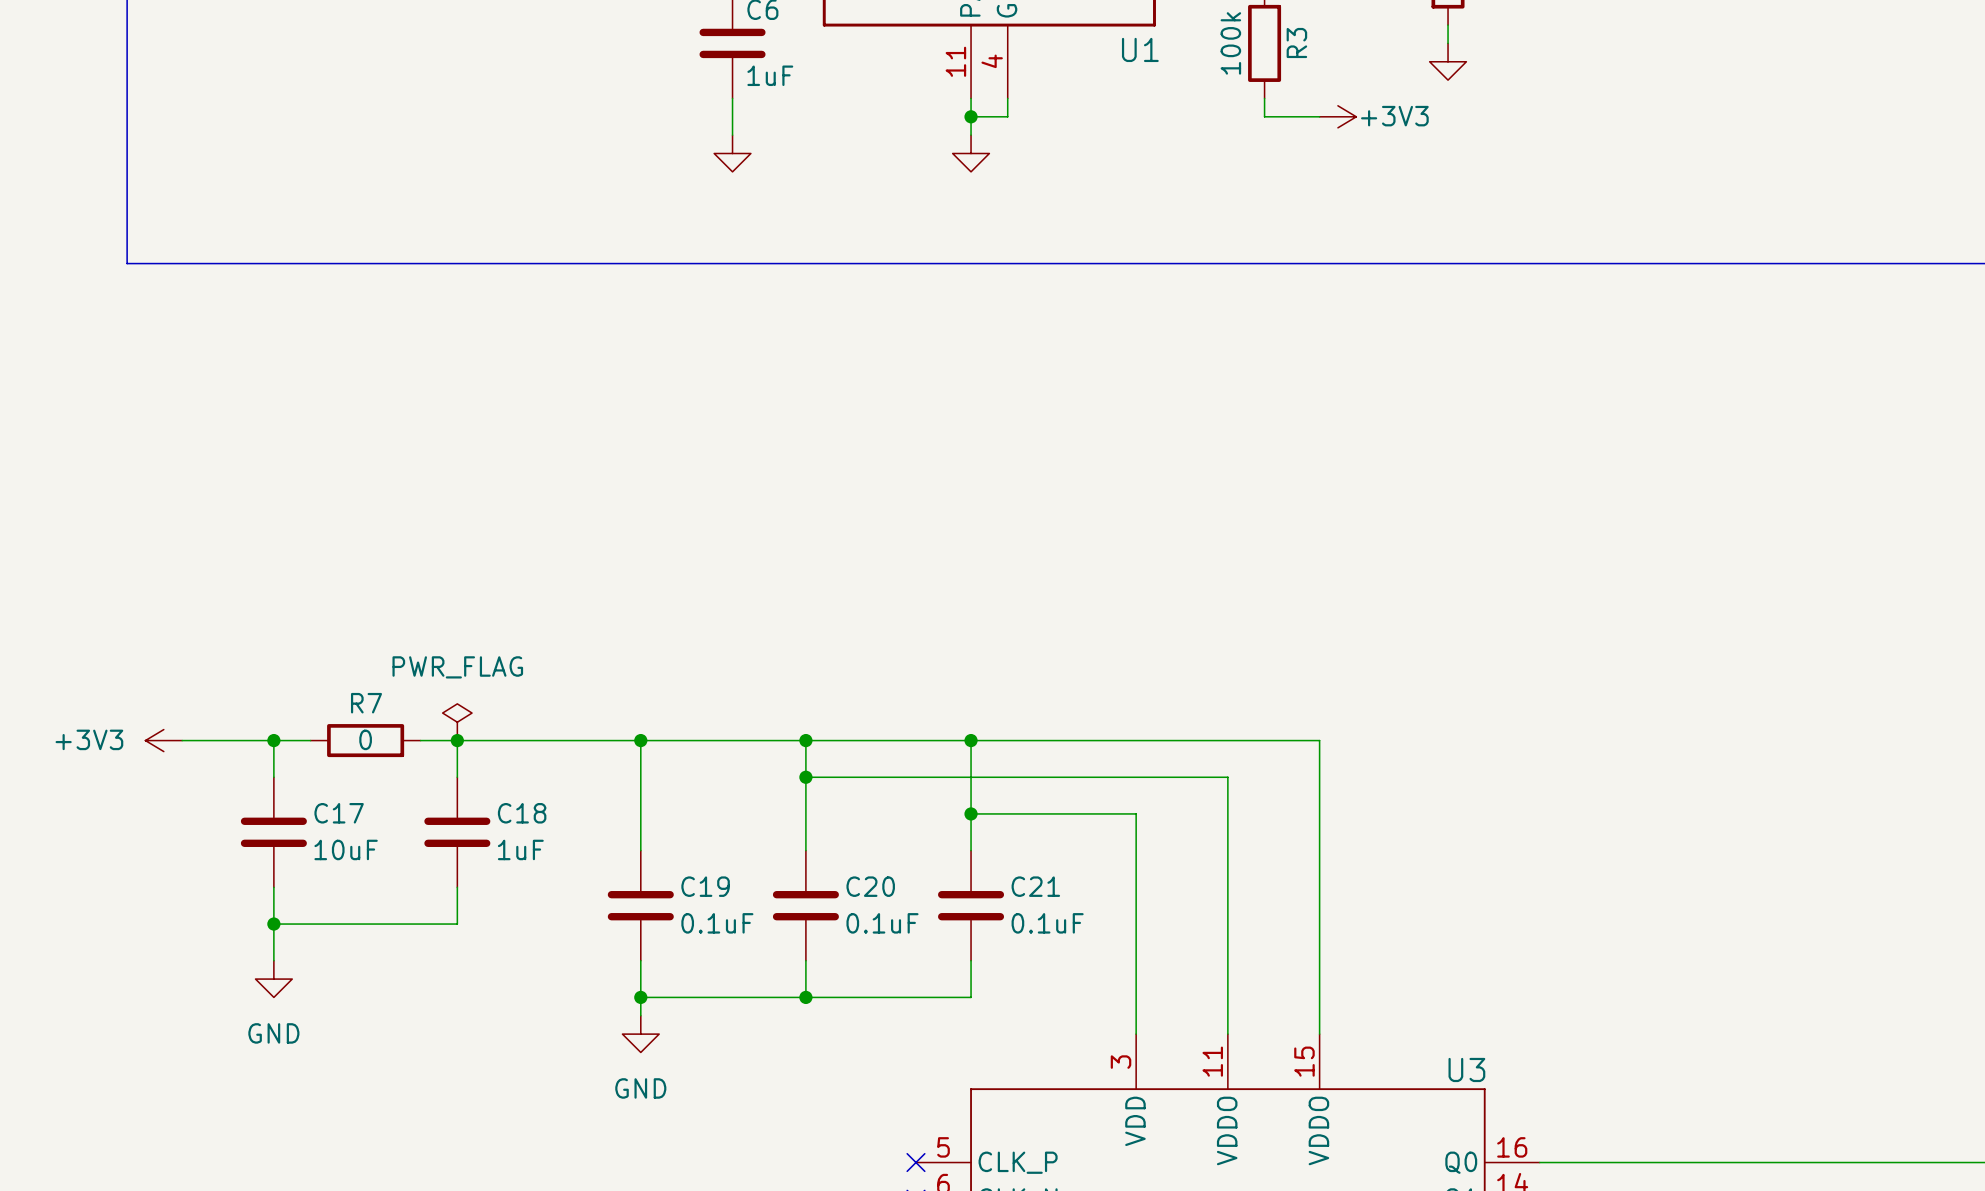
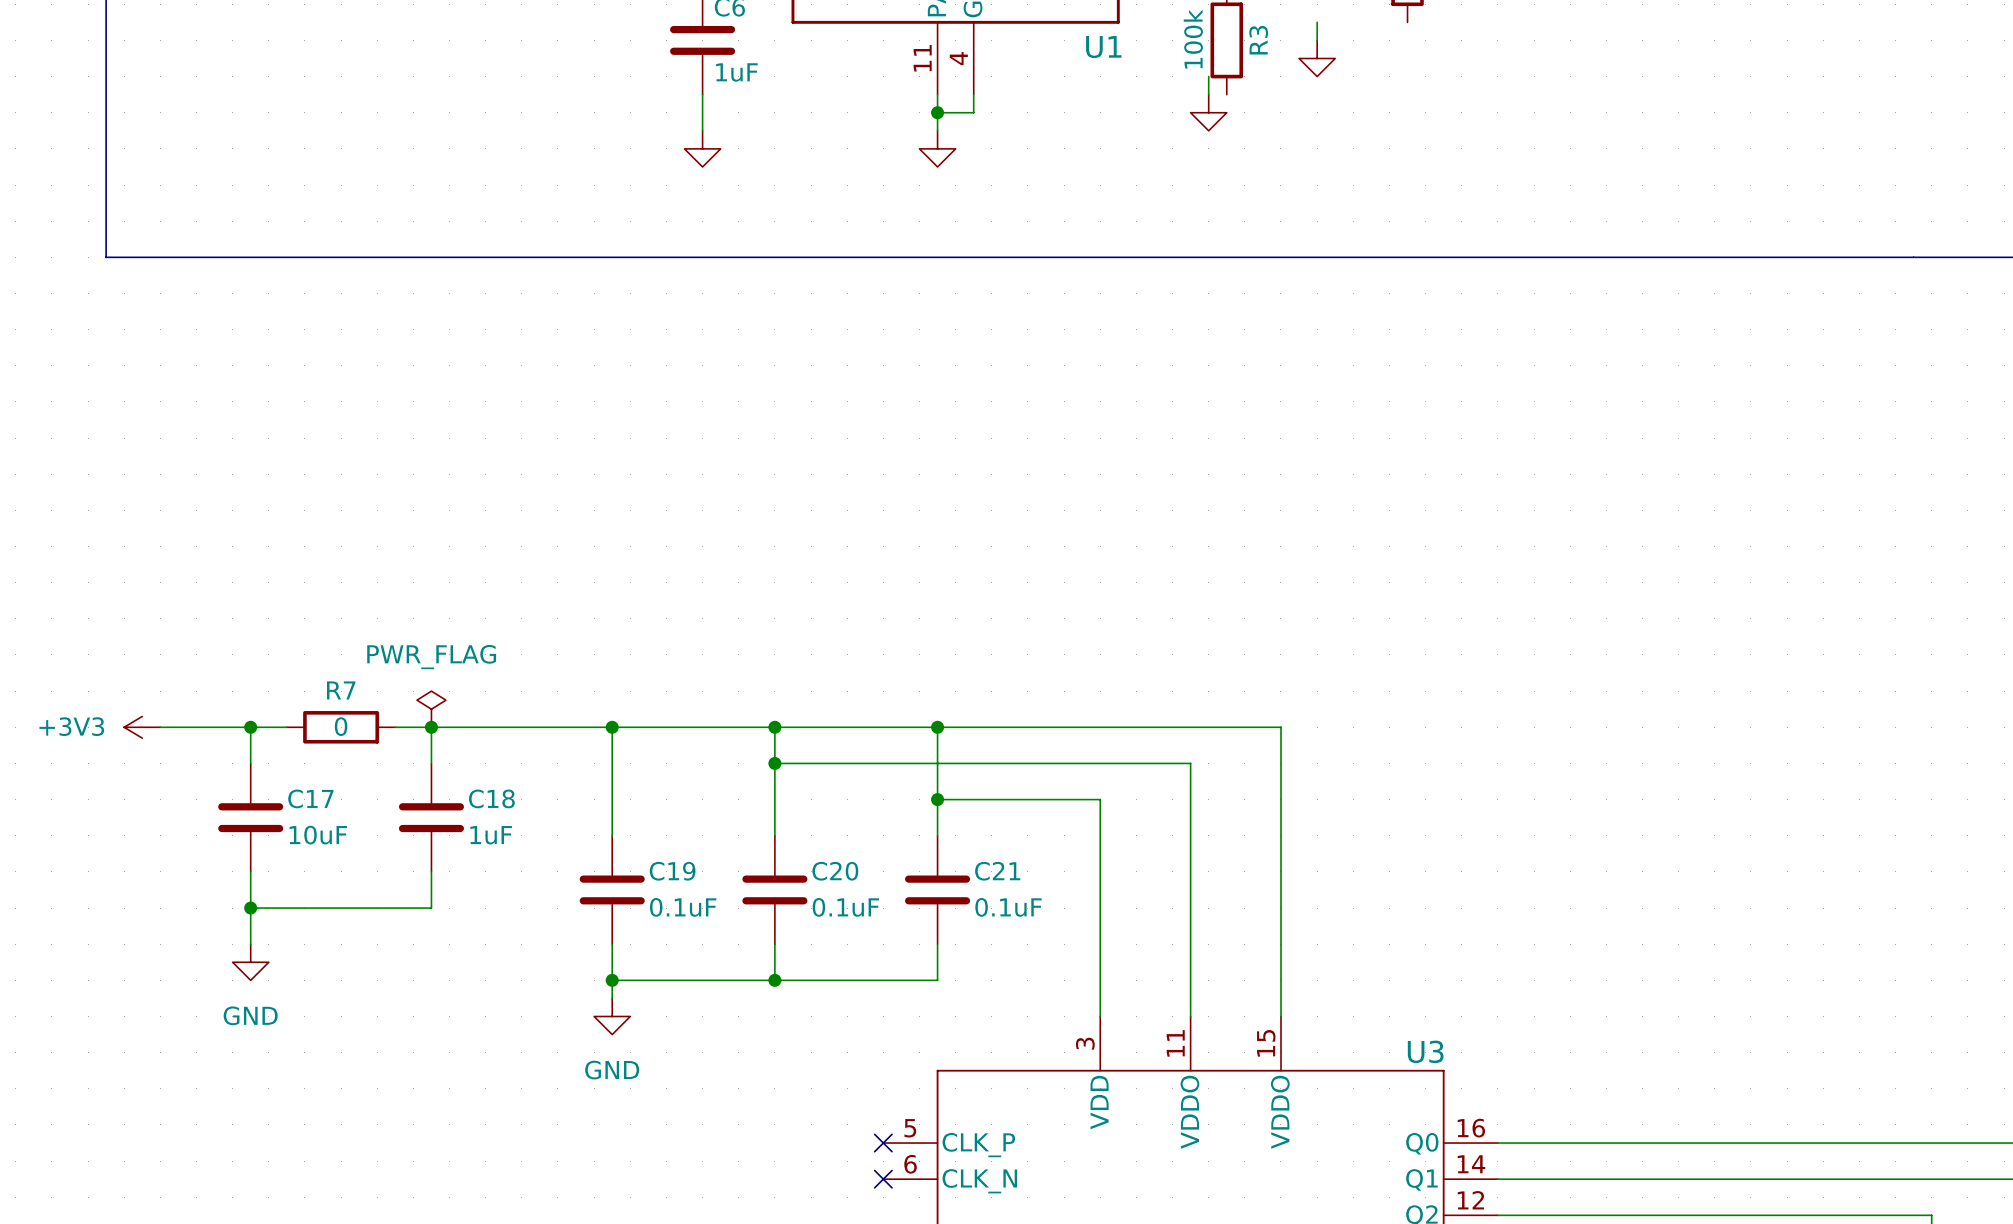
wire: (1448, 25) (1448, 43) -> (1317, 22) (1317, 40)
power symbol position: (1448, 61) -> (1317, 58)
wire: none -> (1208, 76) (1208, 94)
wire: (1264, 98) (1264, 116) (1319, 116) -> none
power symbol: none -> (1208, 112)
power symbol: +3V3 (1337, 116) -> none

